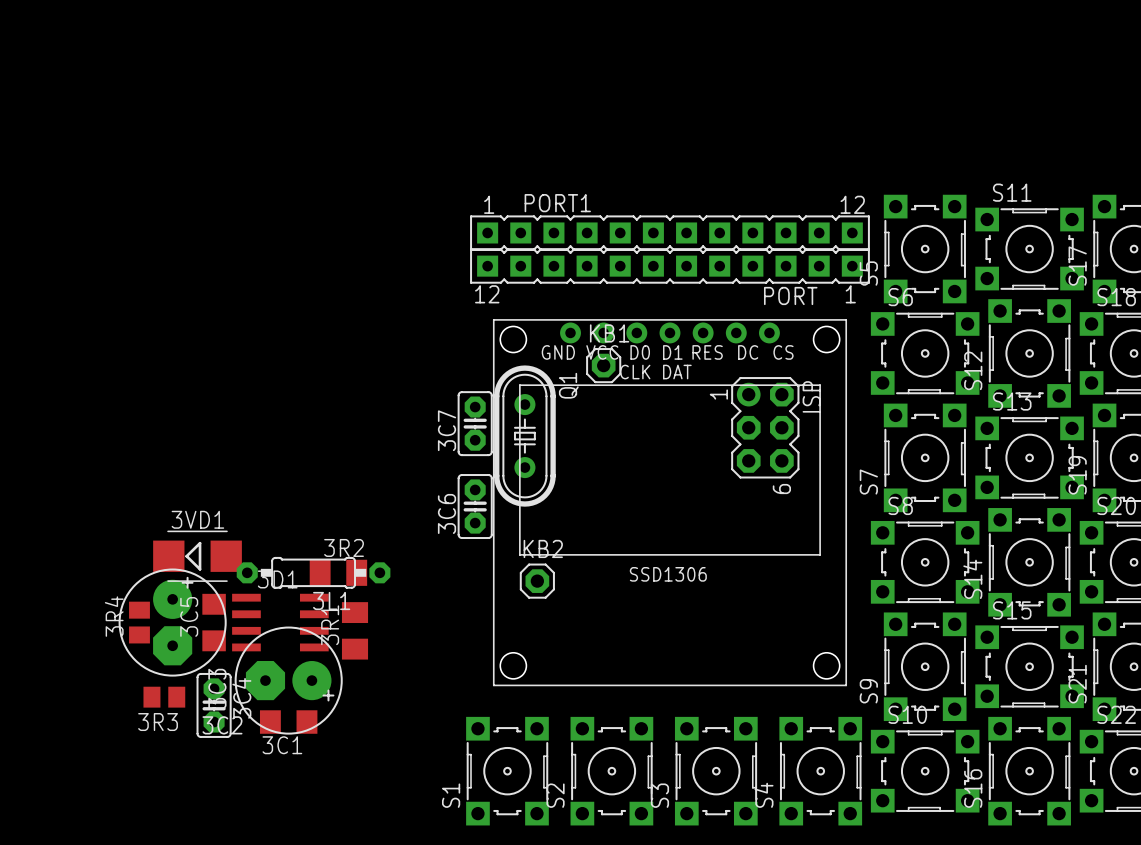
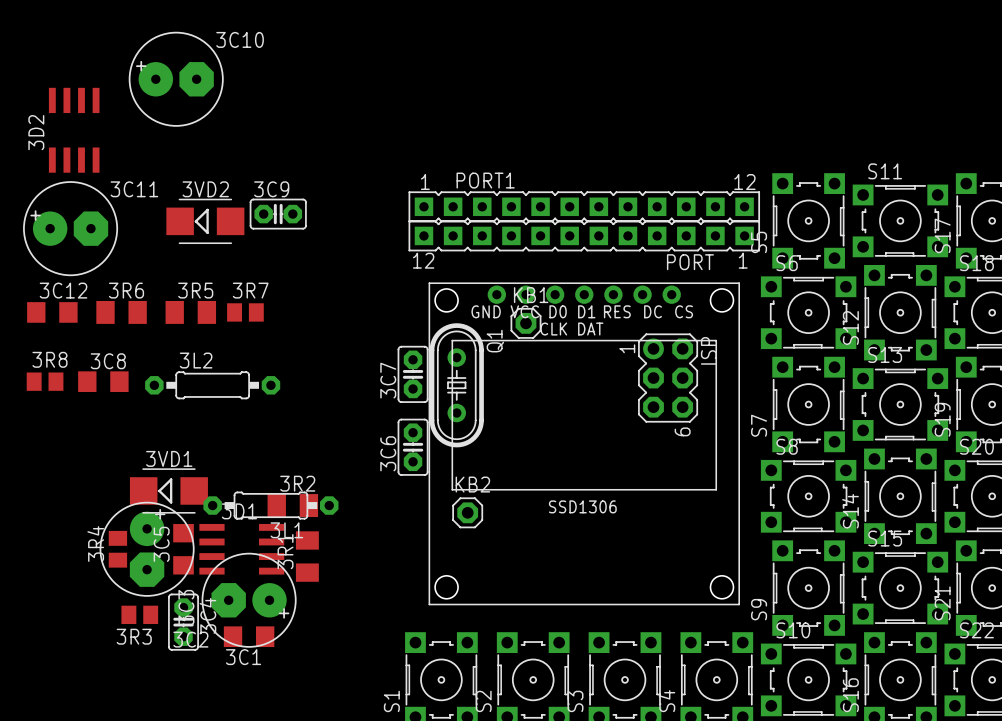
3C10: none -> (176, 79)
3D2: none -> (74, 130)
3C9: none -> (278, 214)
3VD2: none -> (205, 221)
3C11: none -> (70, 228)
3C12: none -> (52, 312)
3R6: none -> (121, 312)
3R5: none -> (190, 312)
3R7: none -> (245, 312)
3R8: none -> (45, 381)
3C8: none -> (103, 381)
3L2: none -> (212, 385)

